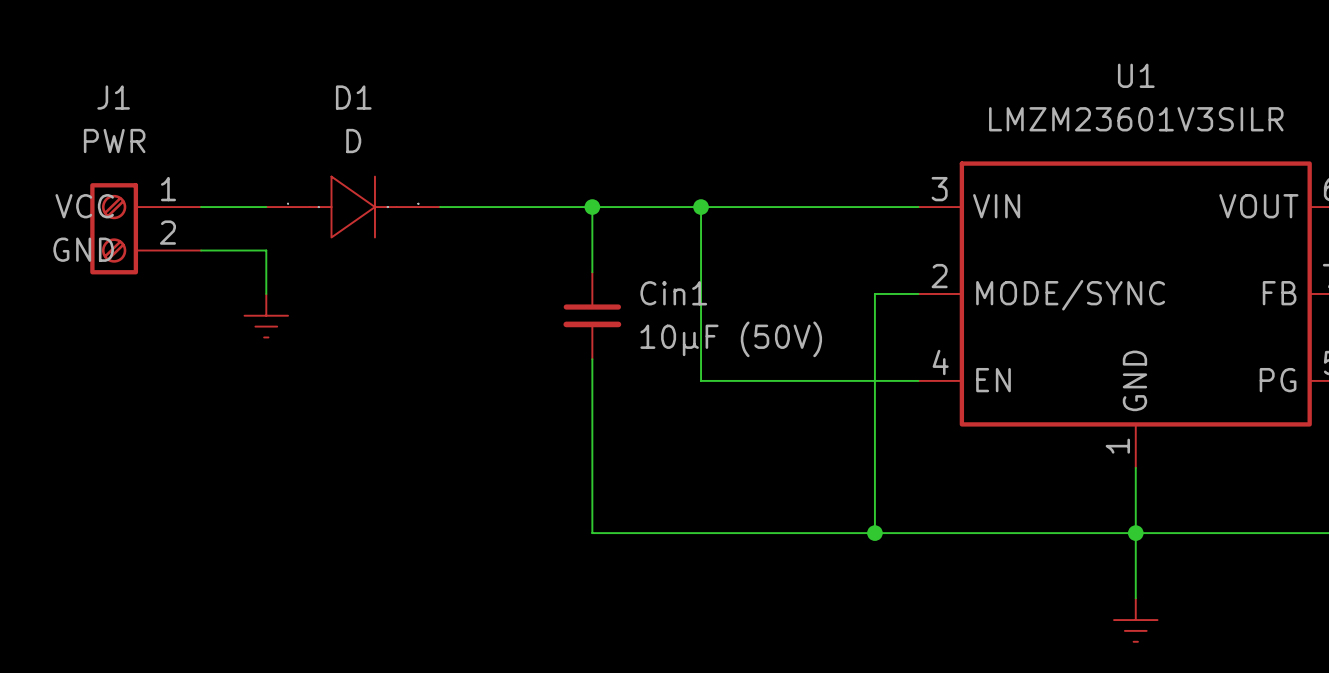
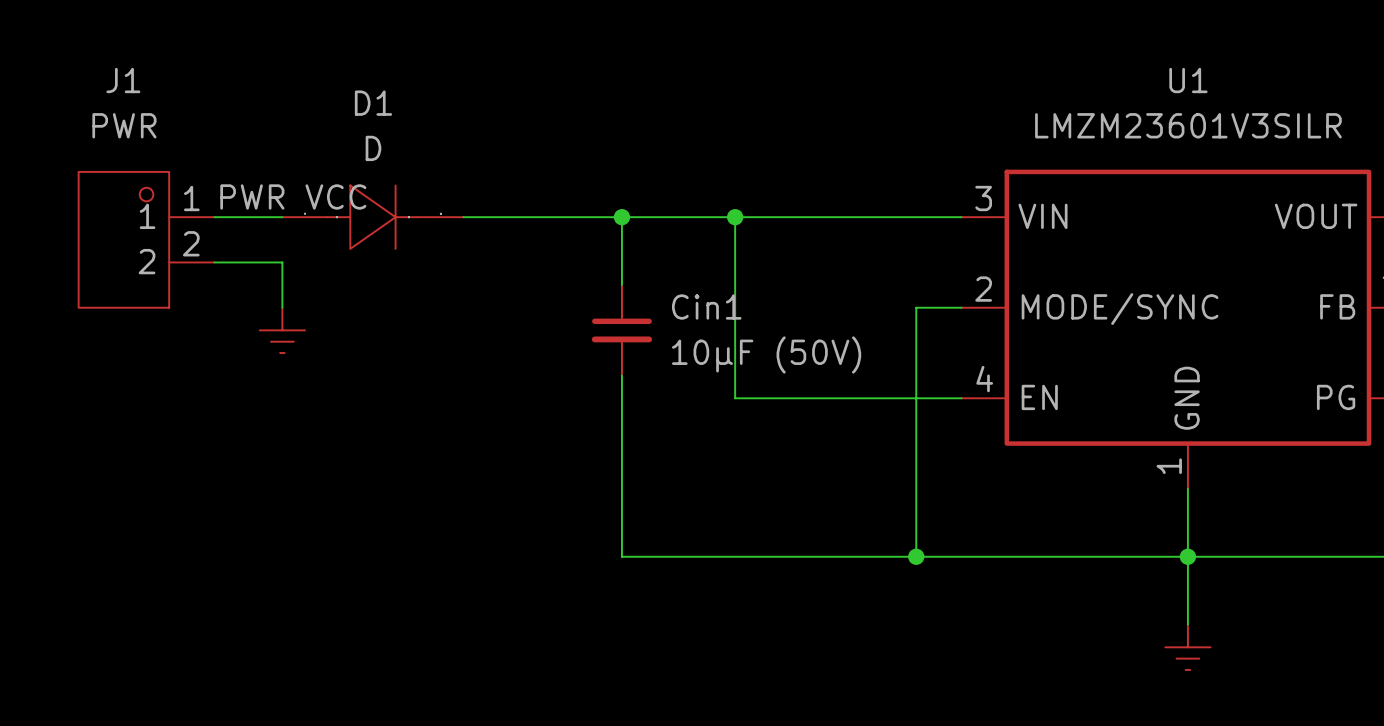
J1 symbol: [90, 183, 202, 275] -> [78, 171, 215, 308]
label: none -> PWR VCC (293, 196)

